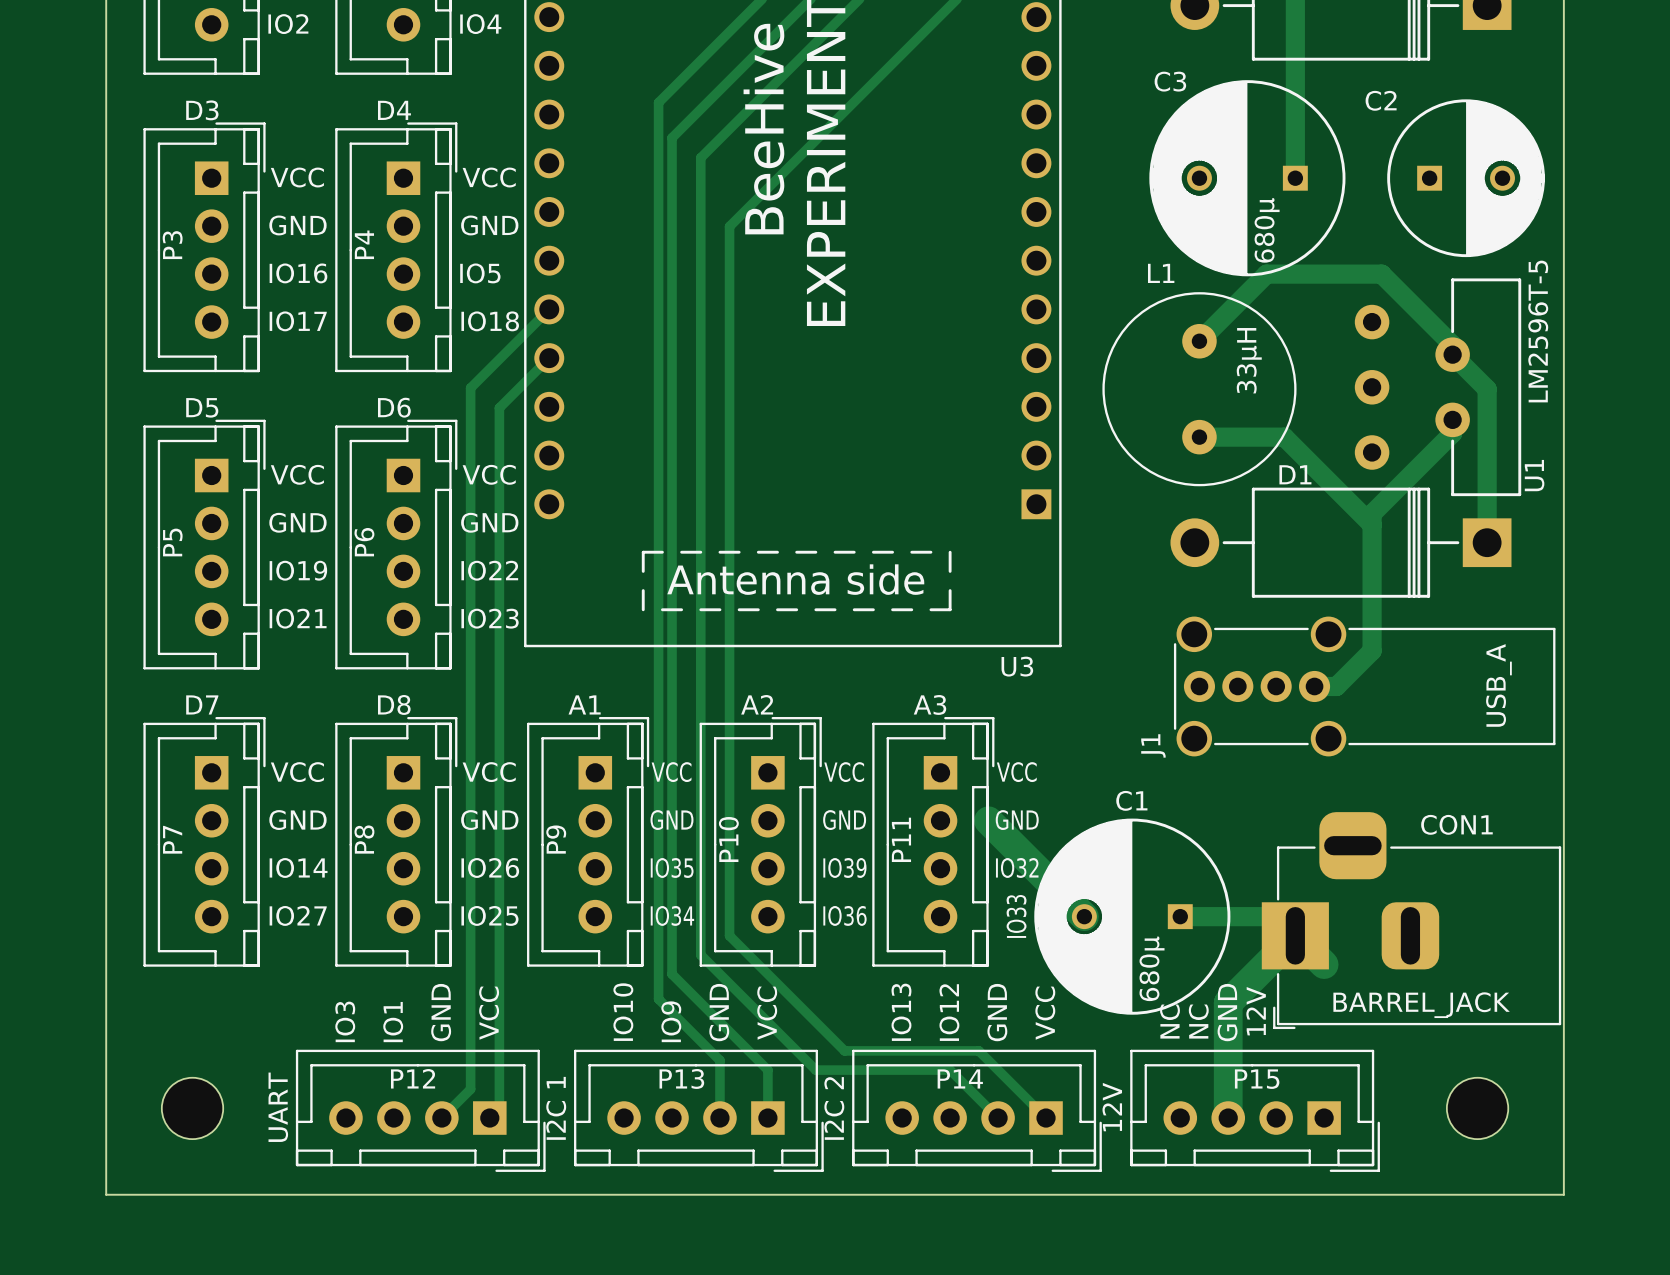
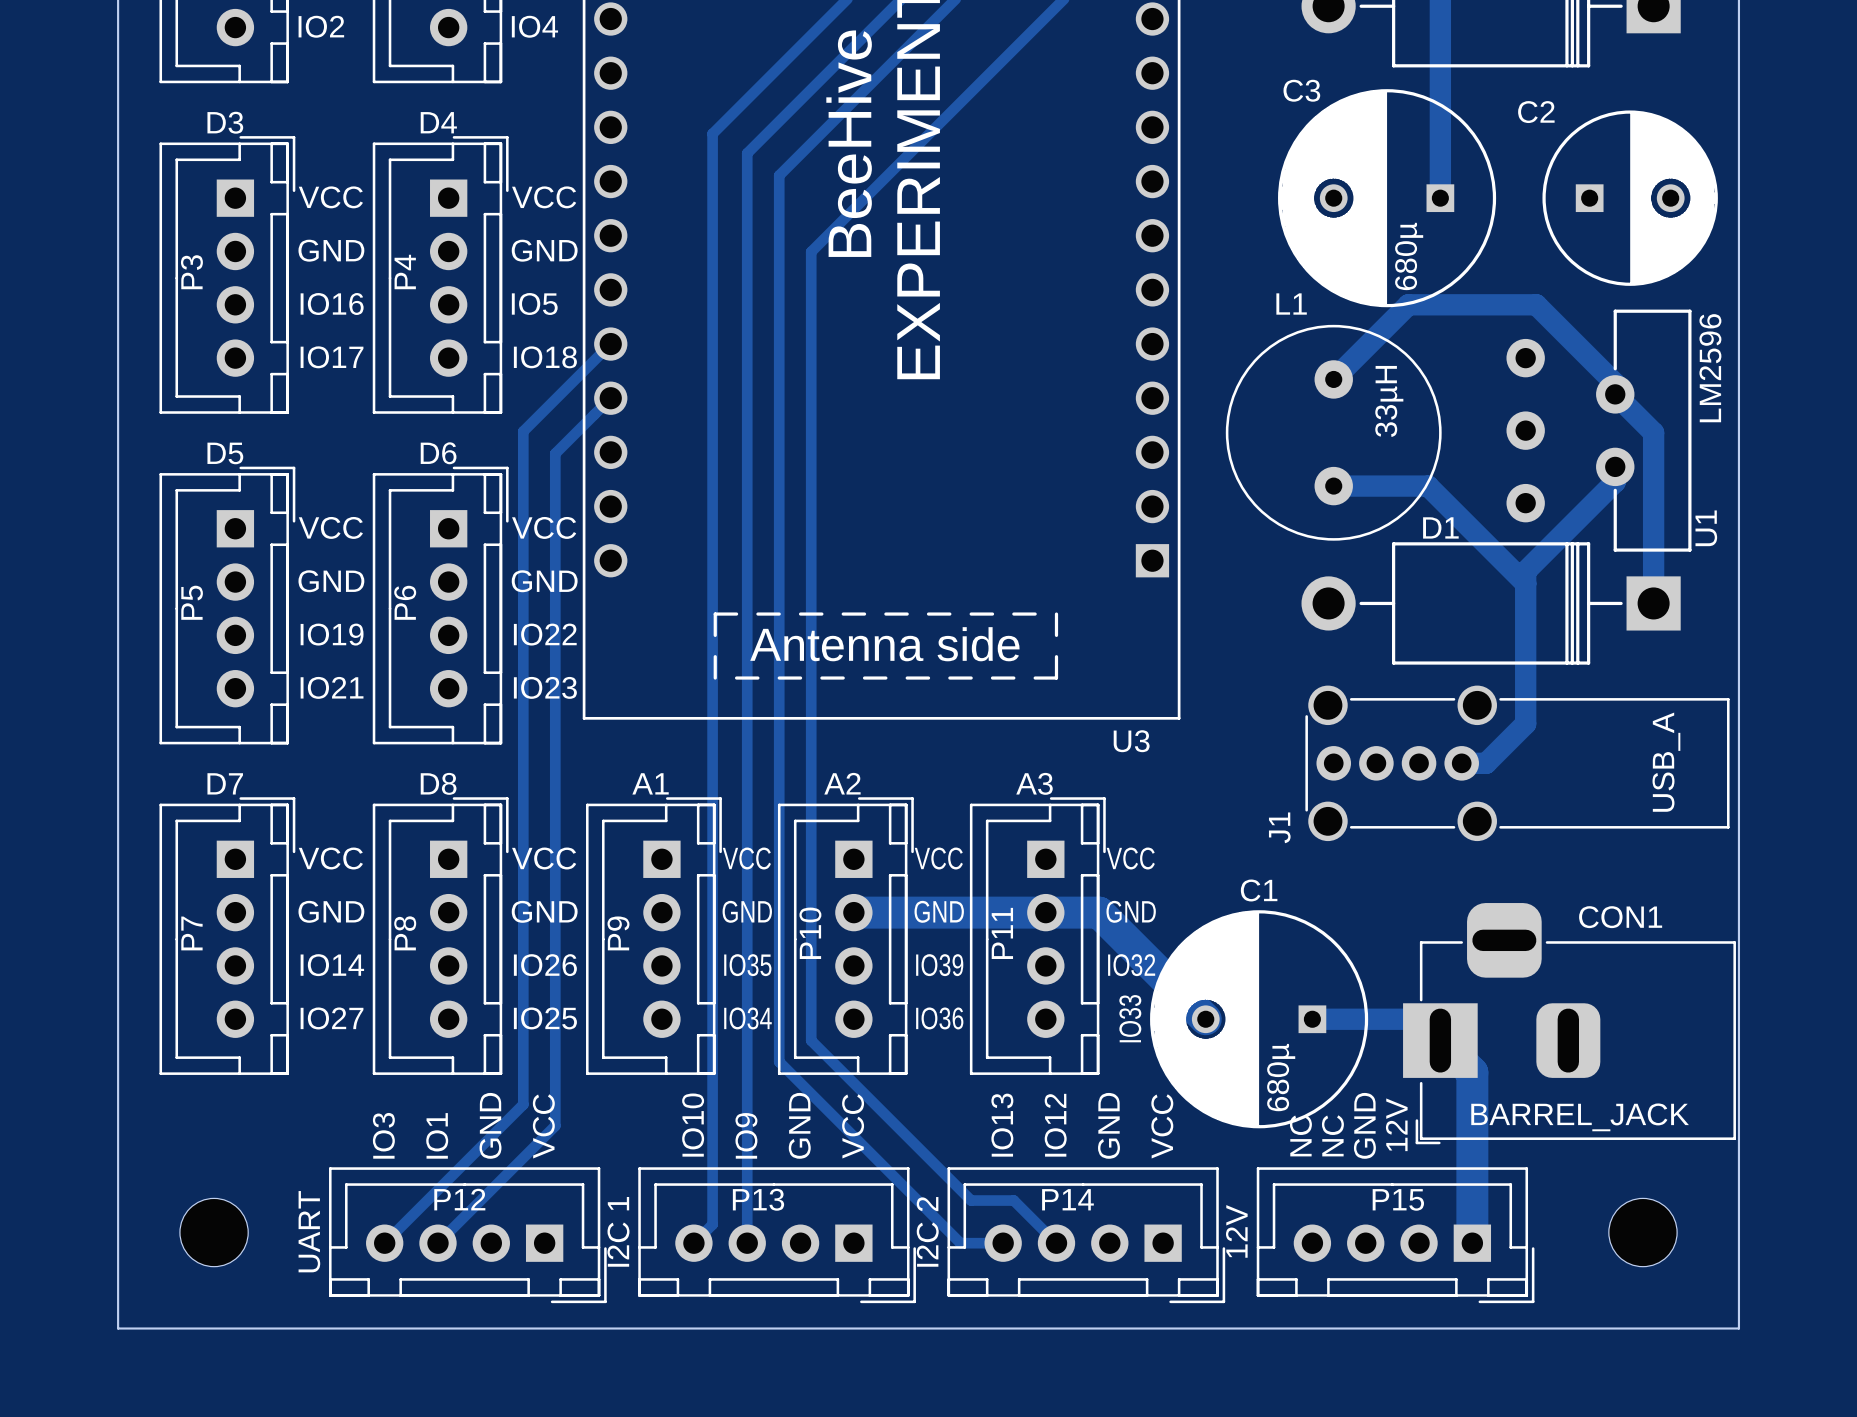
track: (658, 102) (658, 999) (719, 1060) (719, 1118) -> (732, 114) (712, 133) (712, 1224) (693, 1243)
U1 value: LM2596T-5 (1538, 331) -> LM2596 (1710, 368)
track: none -> (853, 912) (1099, 912)
track: (1295, 935) (1228, 1002) (1228, 1118) -> none
track: none -> (1472, 1072) (1472, 1243)
track: (672, 974) (767, 1070) (767, 1118) -> (747, 1083) (747, 1243)
track: (470, 993) (470, 1089) (441, 1118) -> (523, 1104) (384, 1243)
track: (499, 1012) (499, 1108) (489, 1118) -> (555, 1125) (438, 1243)
track: (844, 1050) (978, 1050) (1046, 1118) -> (939, 1168) (971, 1200) (1013, 1200) (1056, 1243)
track: (815, 1070) (950, 1070) (998, 1118) -> (907, 1189) (960, 1243) (1003, 1243)

